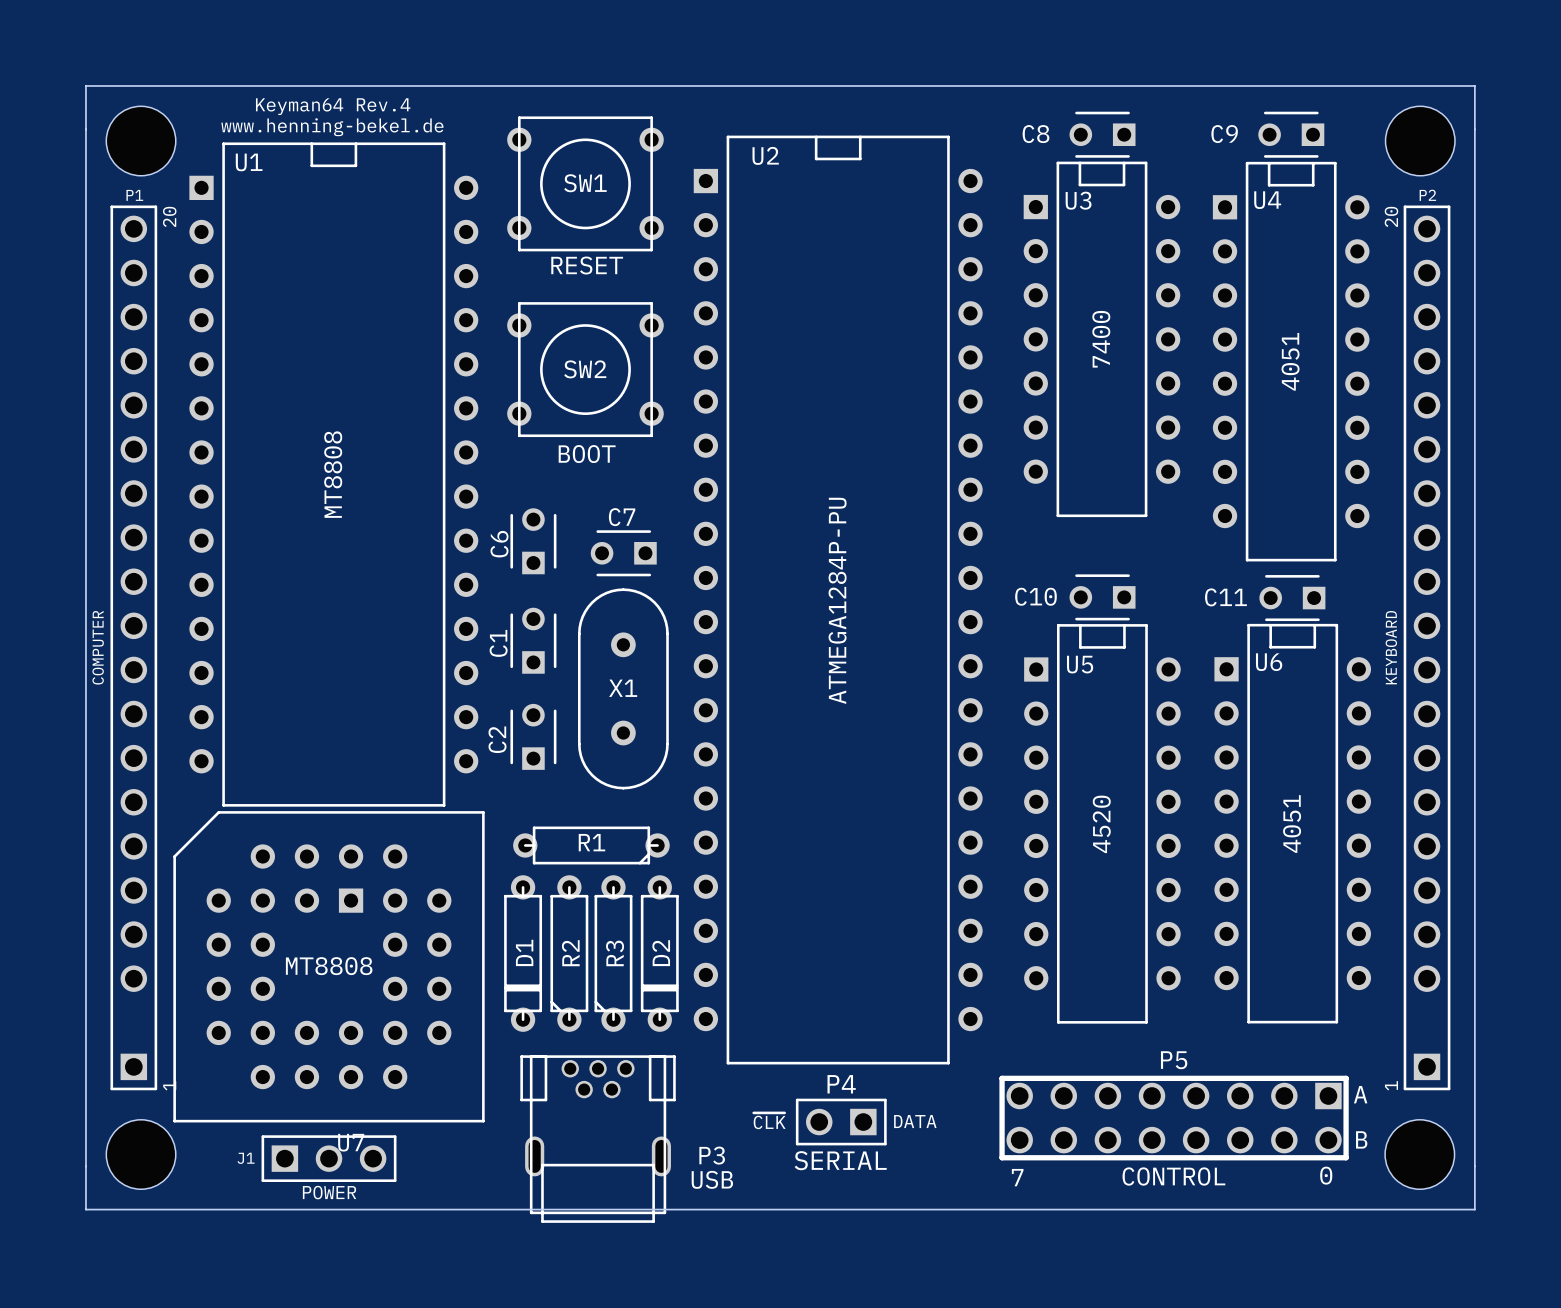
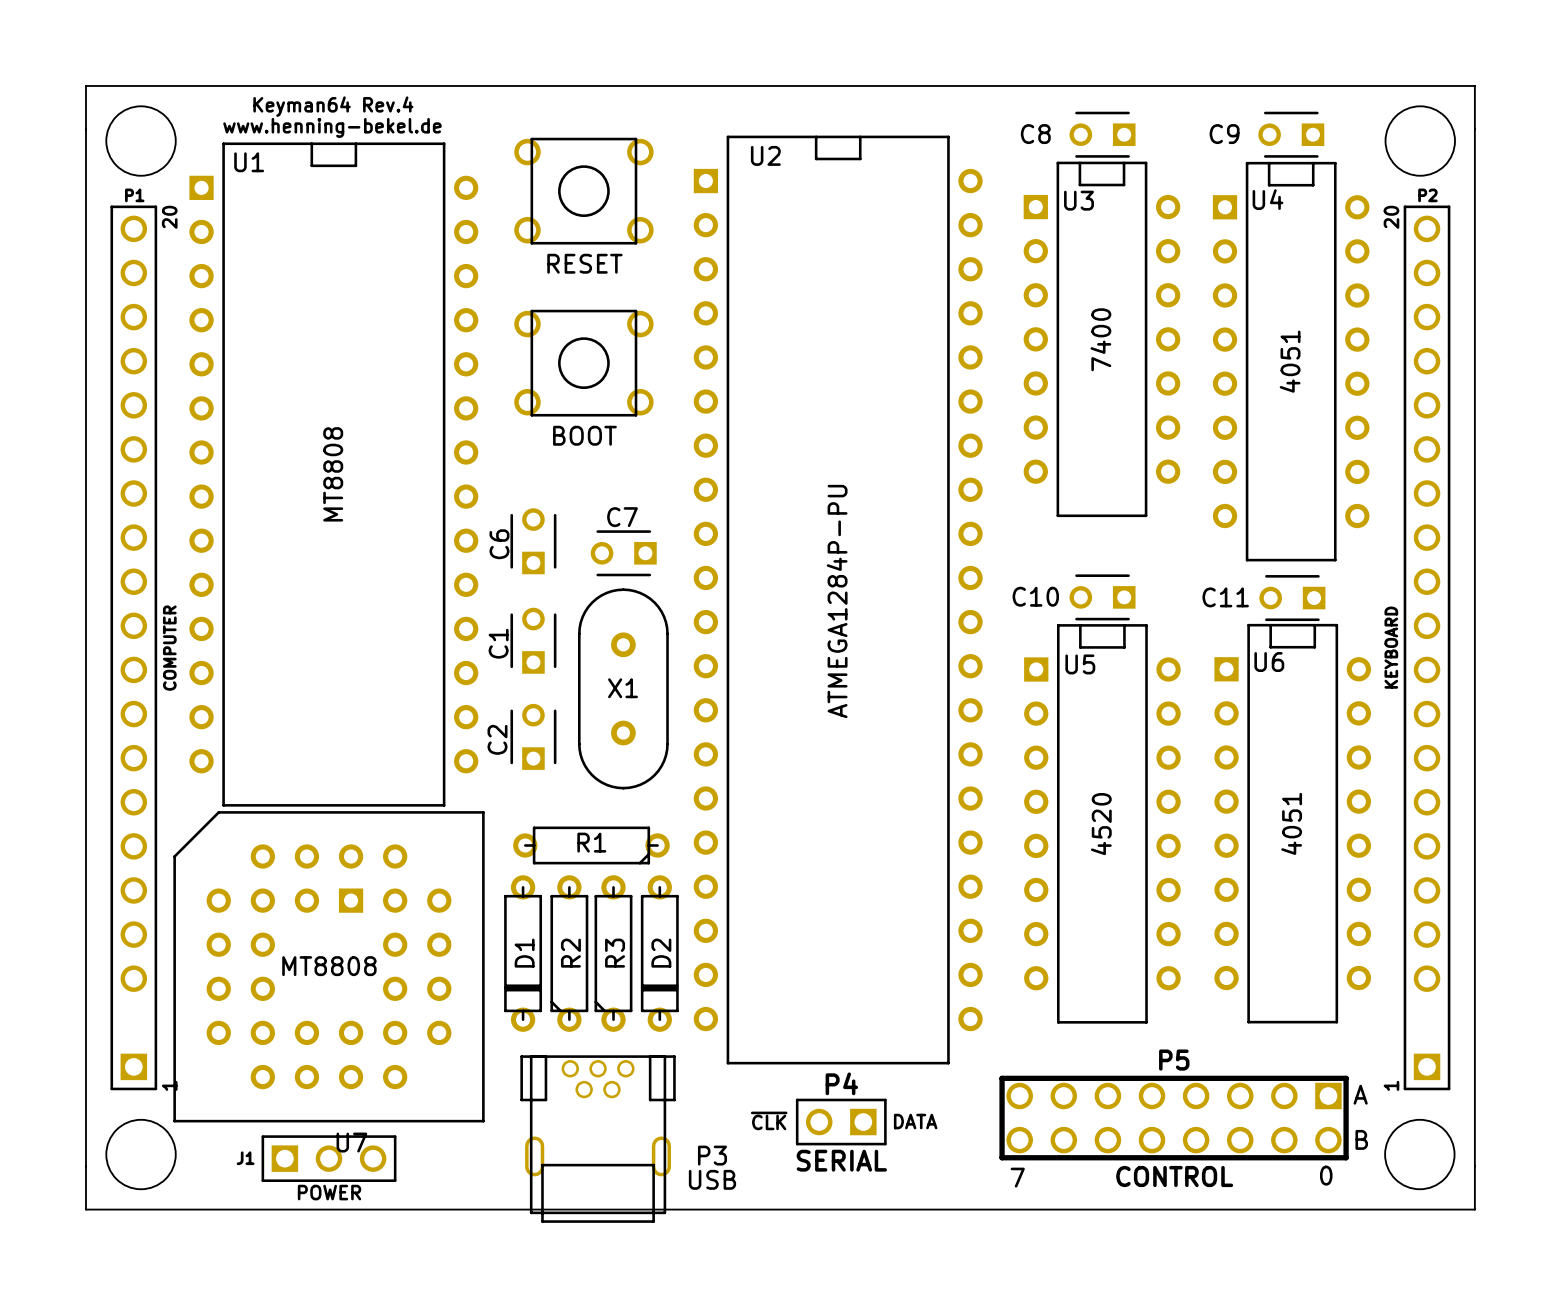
SW1: RESET (585, 183) -> none
part: none -> RESET (583, 191)
part: none -> BOOT (583, 363)
SW2: BOOT (585, 369) -> none
P1 value position: COMPUTER (98, 647) -> COMPUTER (169, 648)

